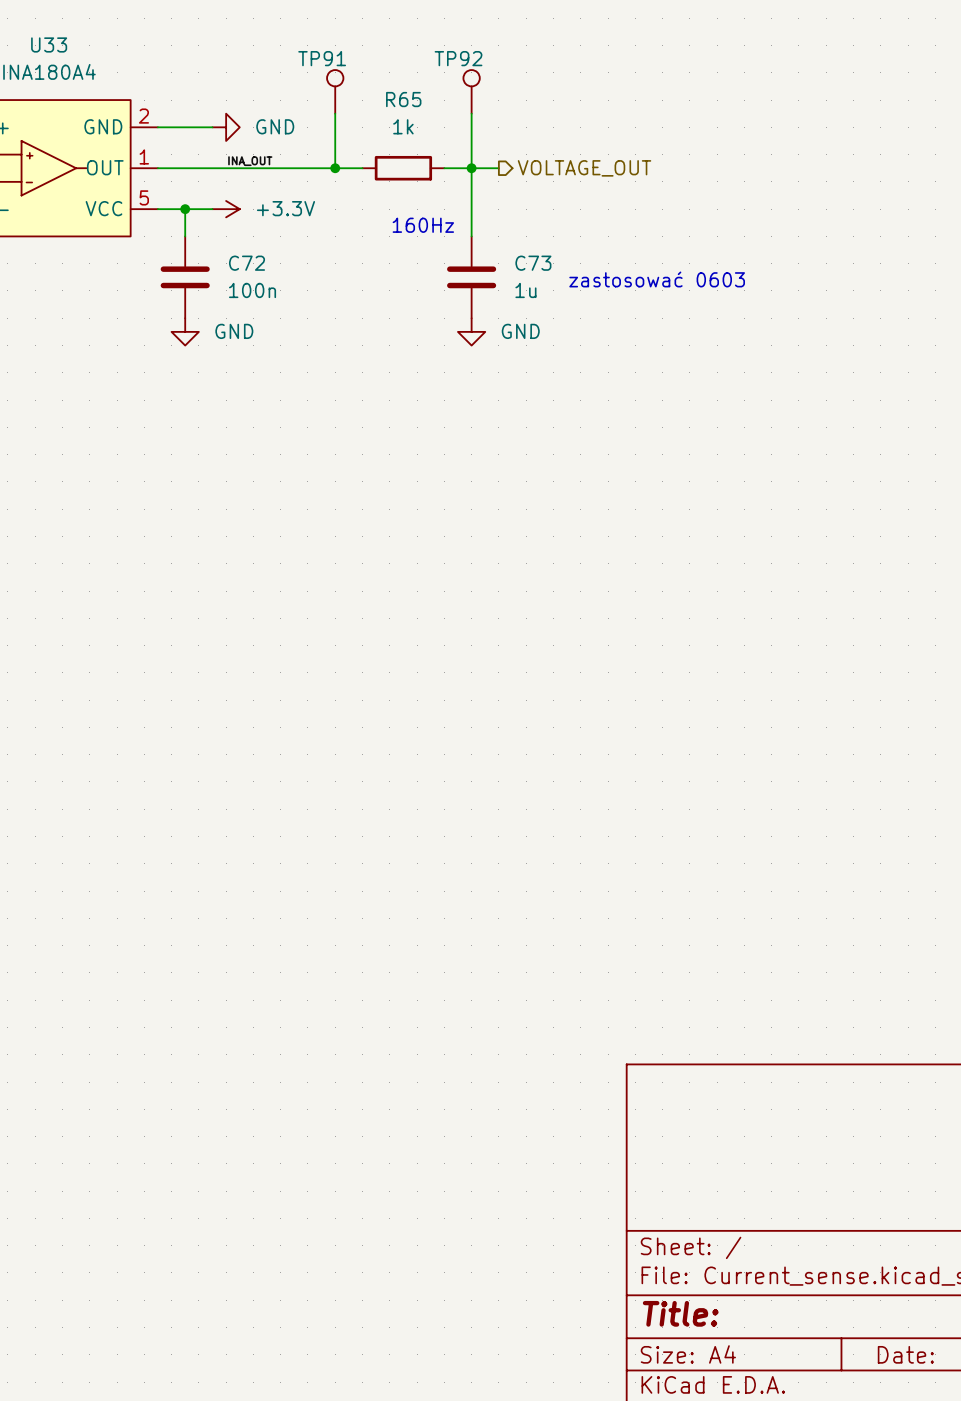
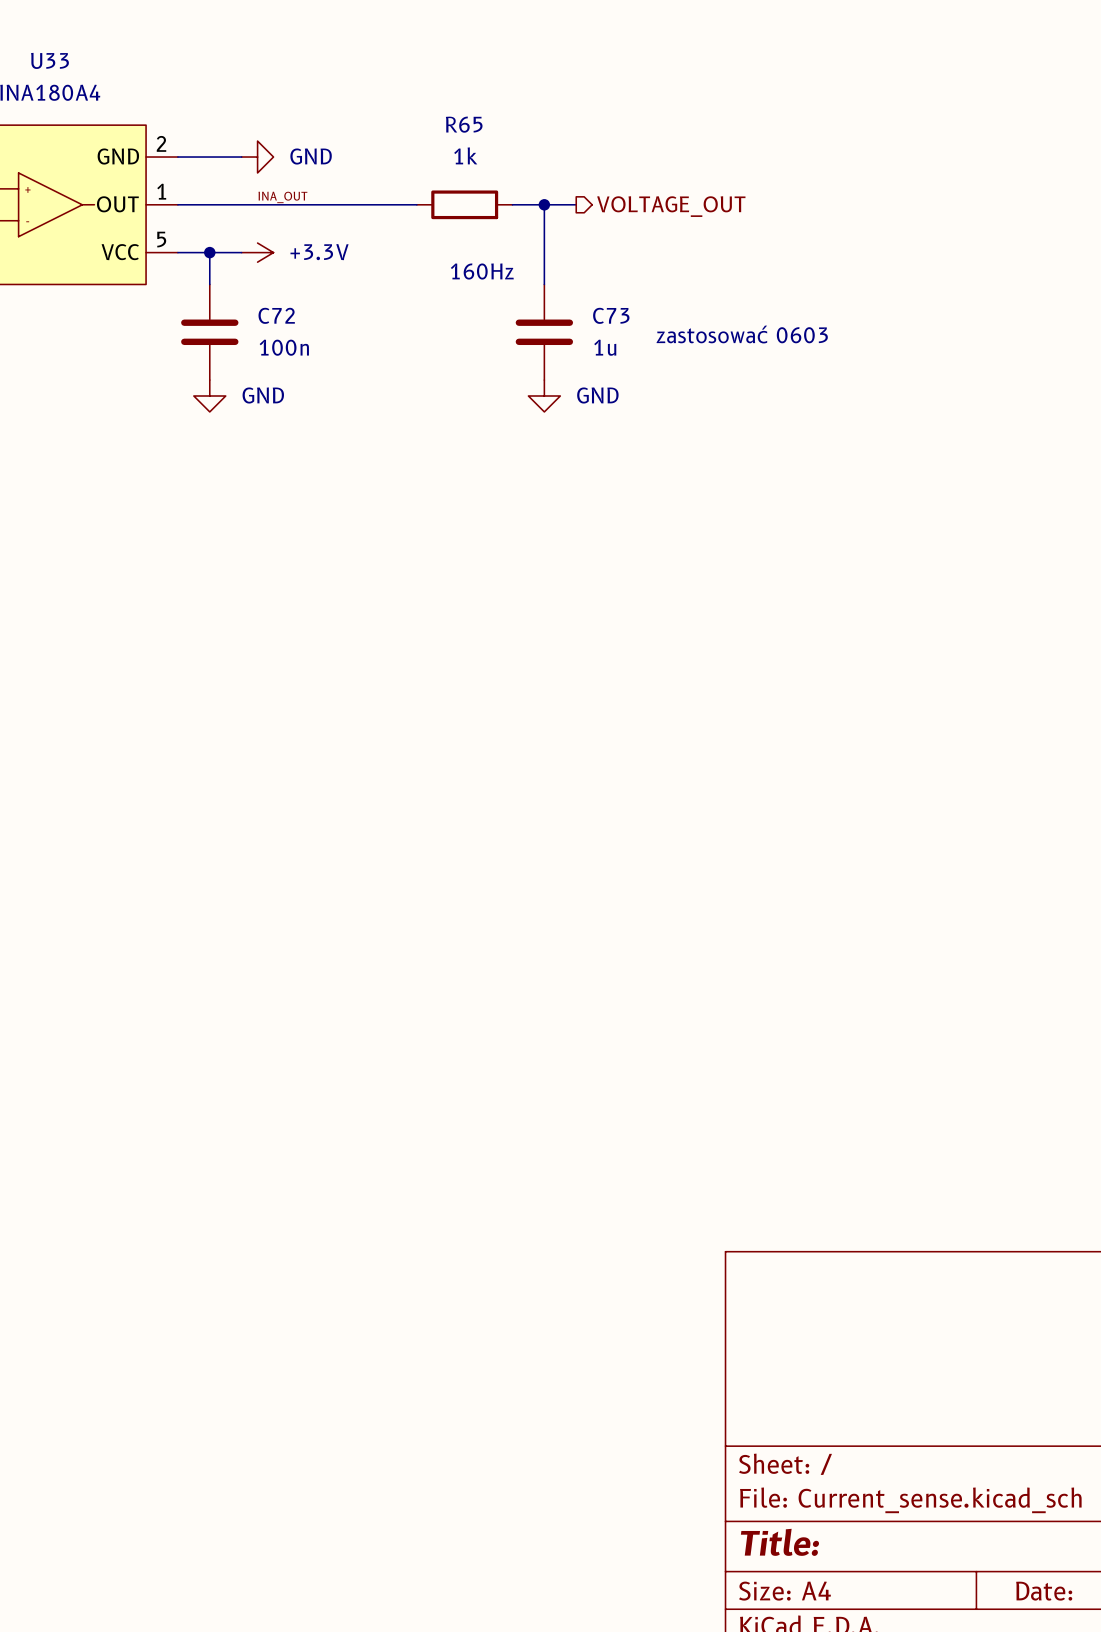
TP91: (335, 91) -> none
TP92: (471, 91) -> none
wire: (335, 113) (335, 168) -> none
wire: (471, 113) (471, 168) -> none
junction: (335, 168) -> none

